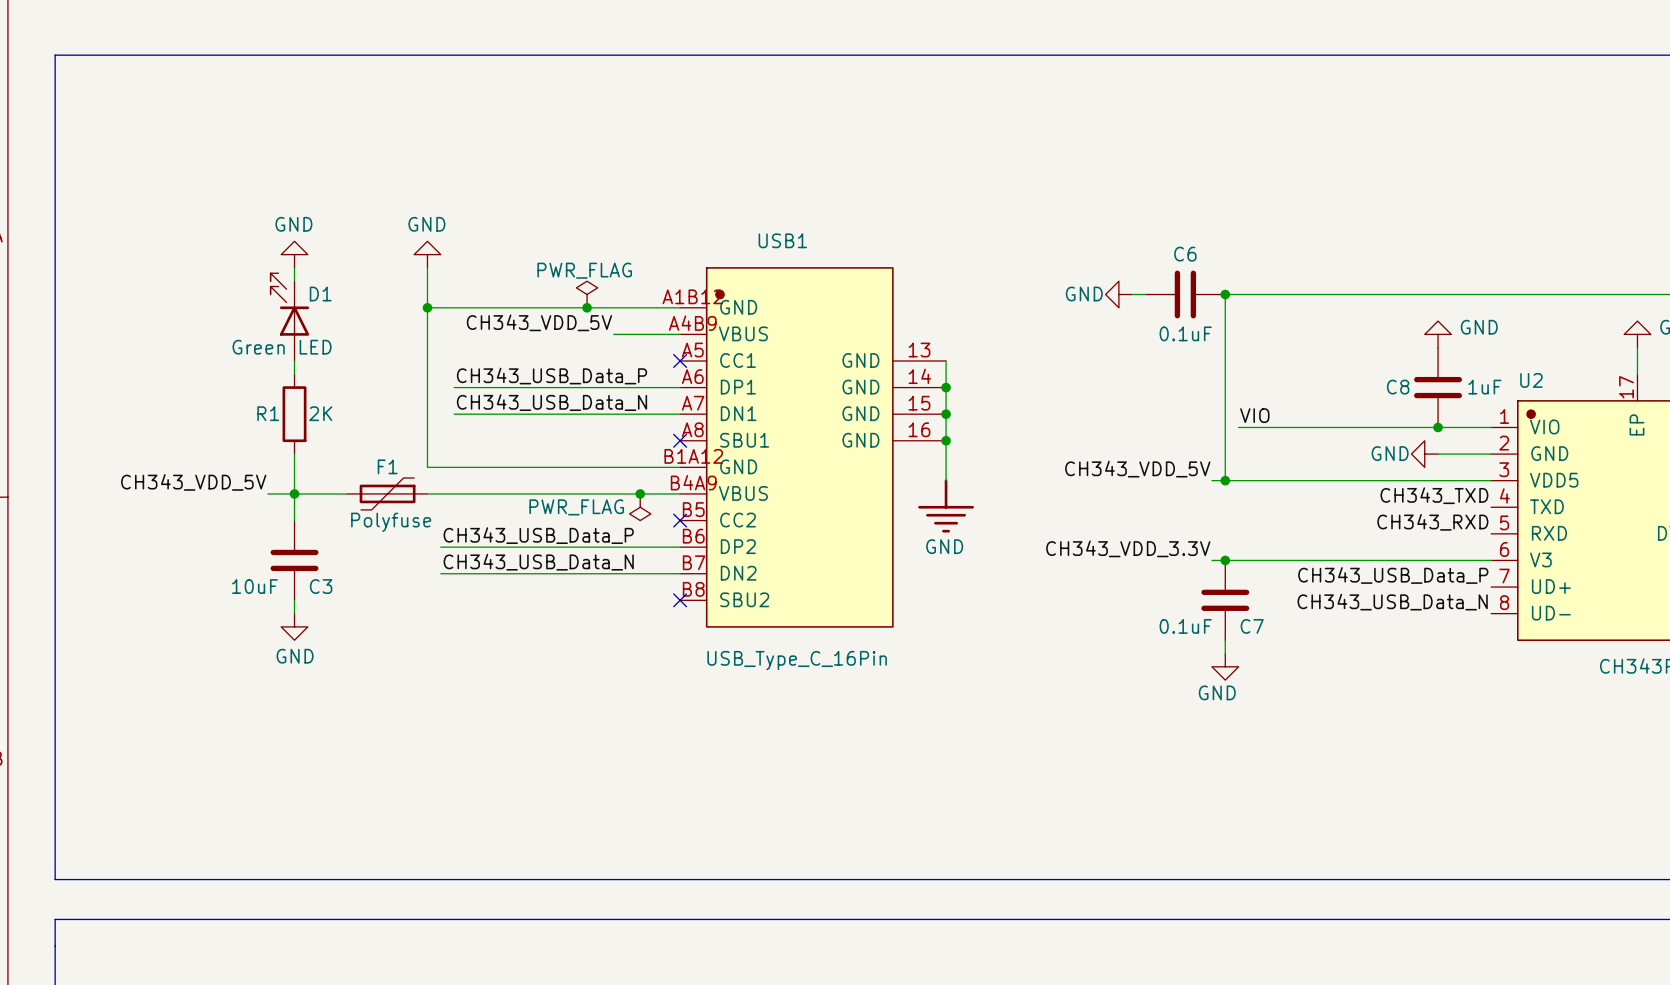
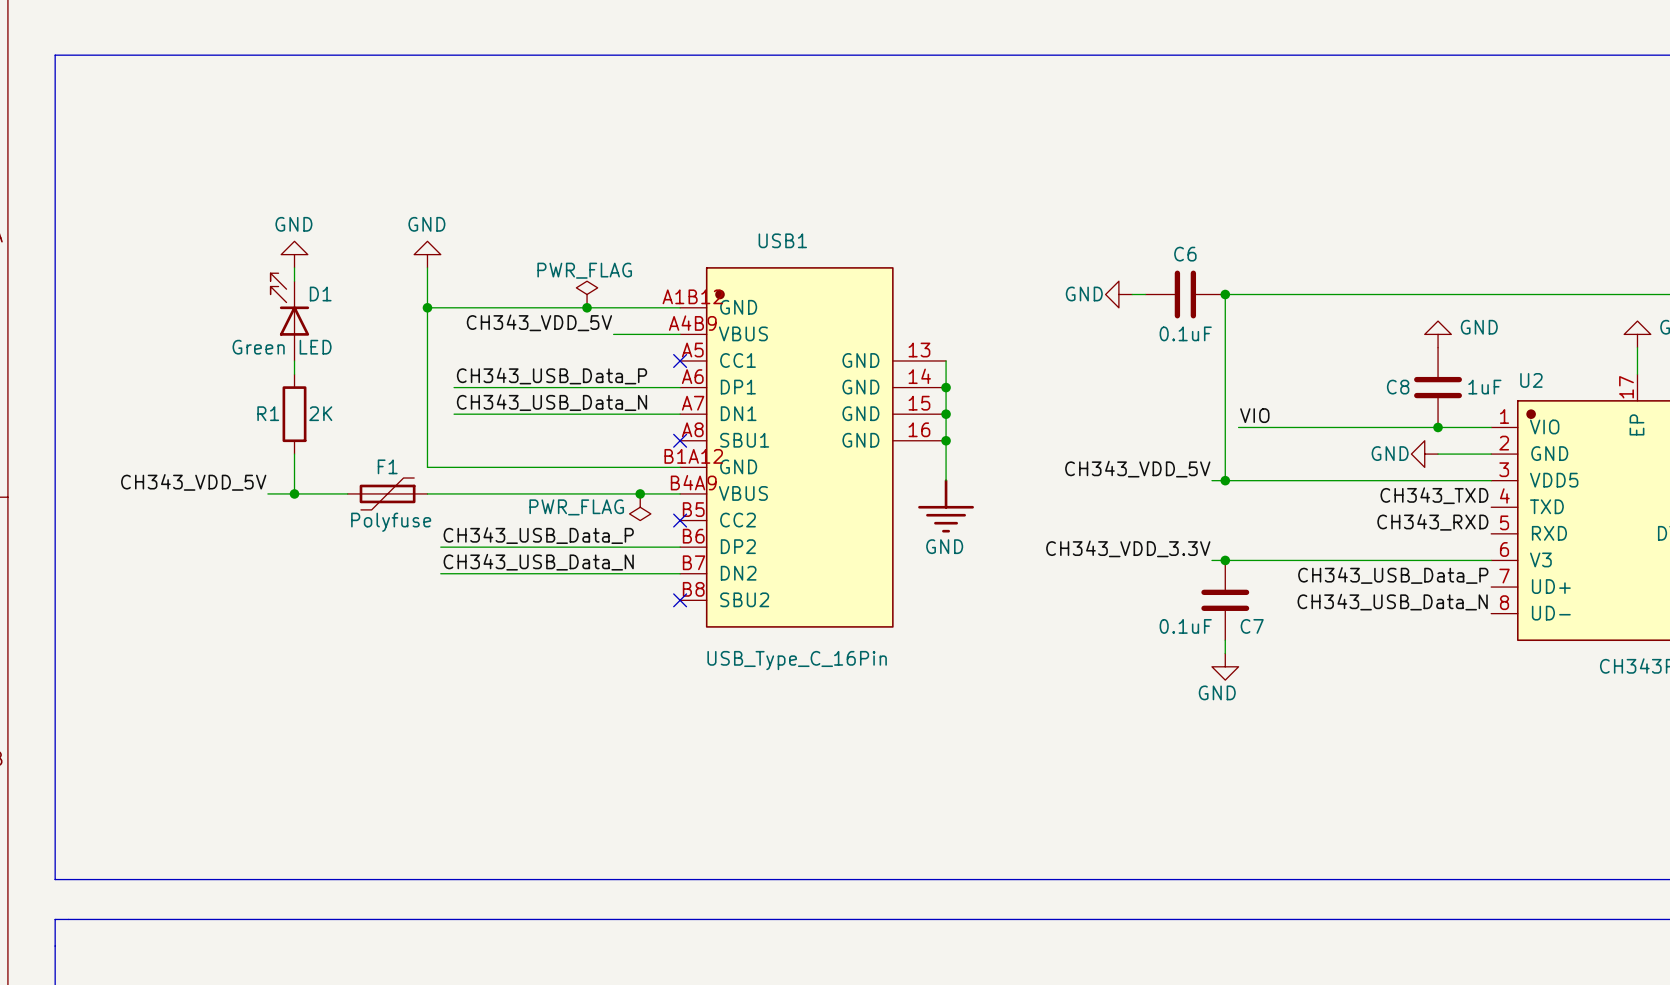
wire: (294, 493) (294, 520) -> none
C3: 10uF (294, 560) -> none
wire: (294, 600) (294, 613) -> none
power symbol: GND (294, 626) -> none

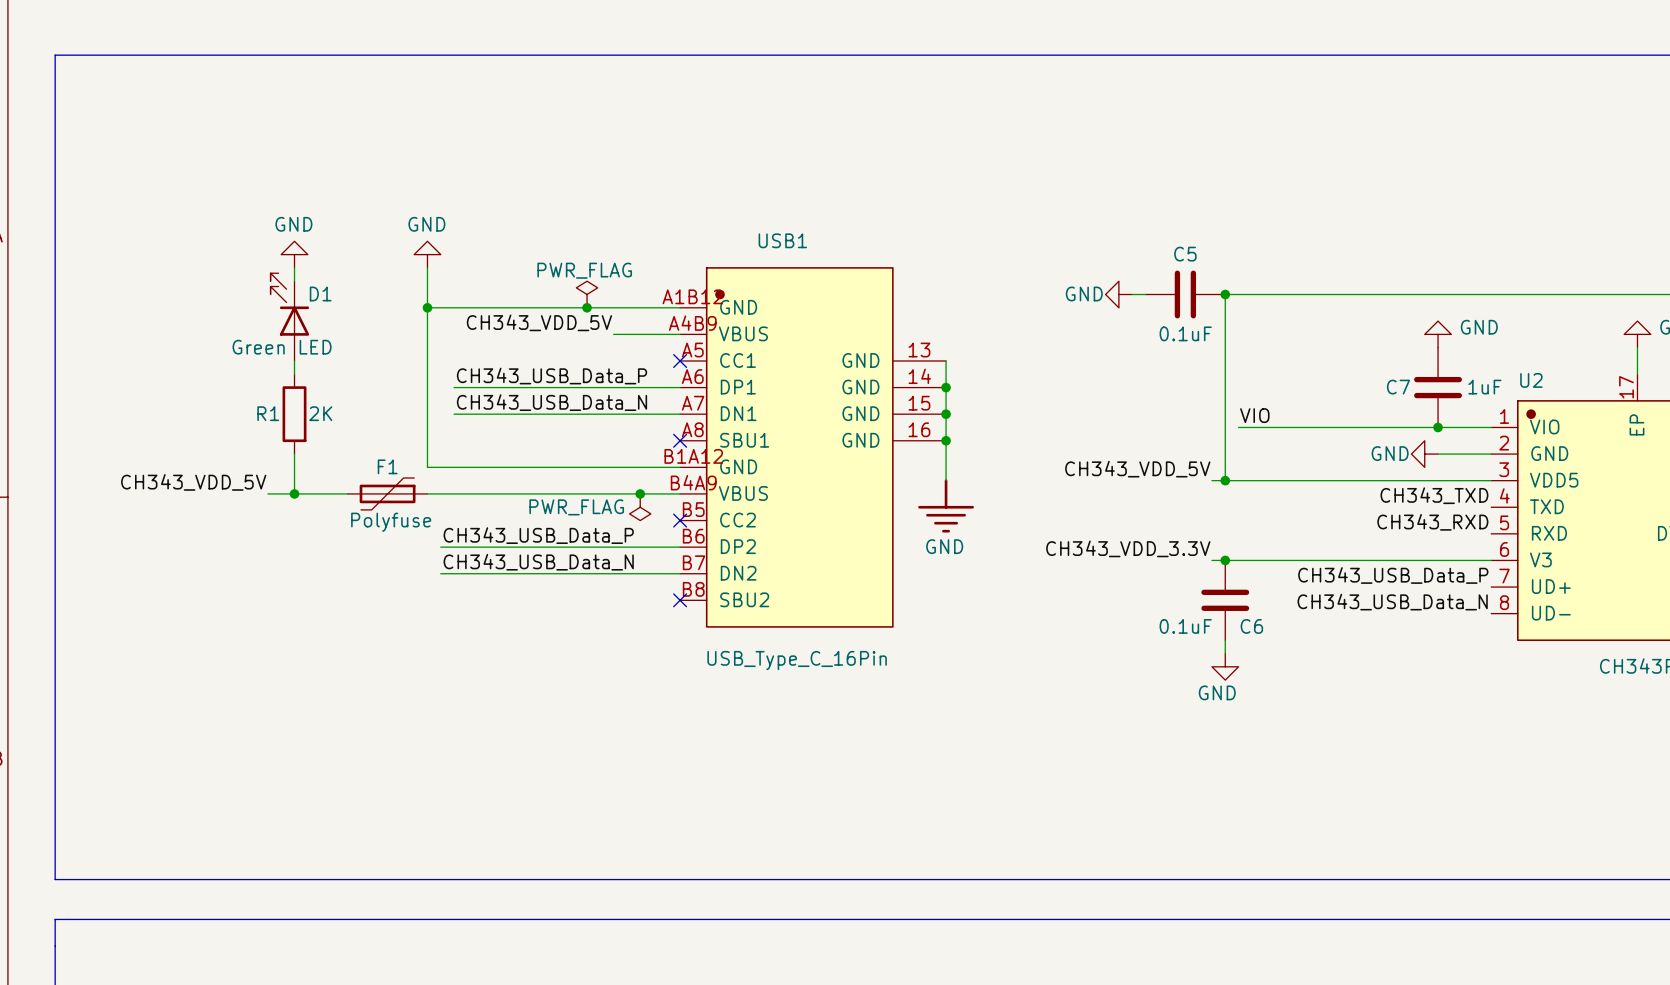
C6 name: C6 (1185, 254) -> C5 (1185, 254)
C8 name: C8 (1398, 387) -> C7 (1398, 387)
C7 name: C7 (1252, 626) -> C6 (1251, 626)

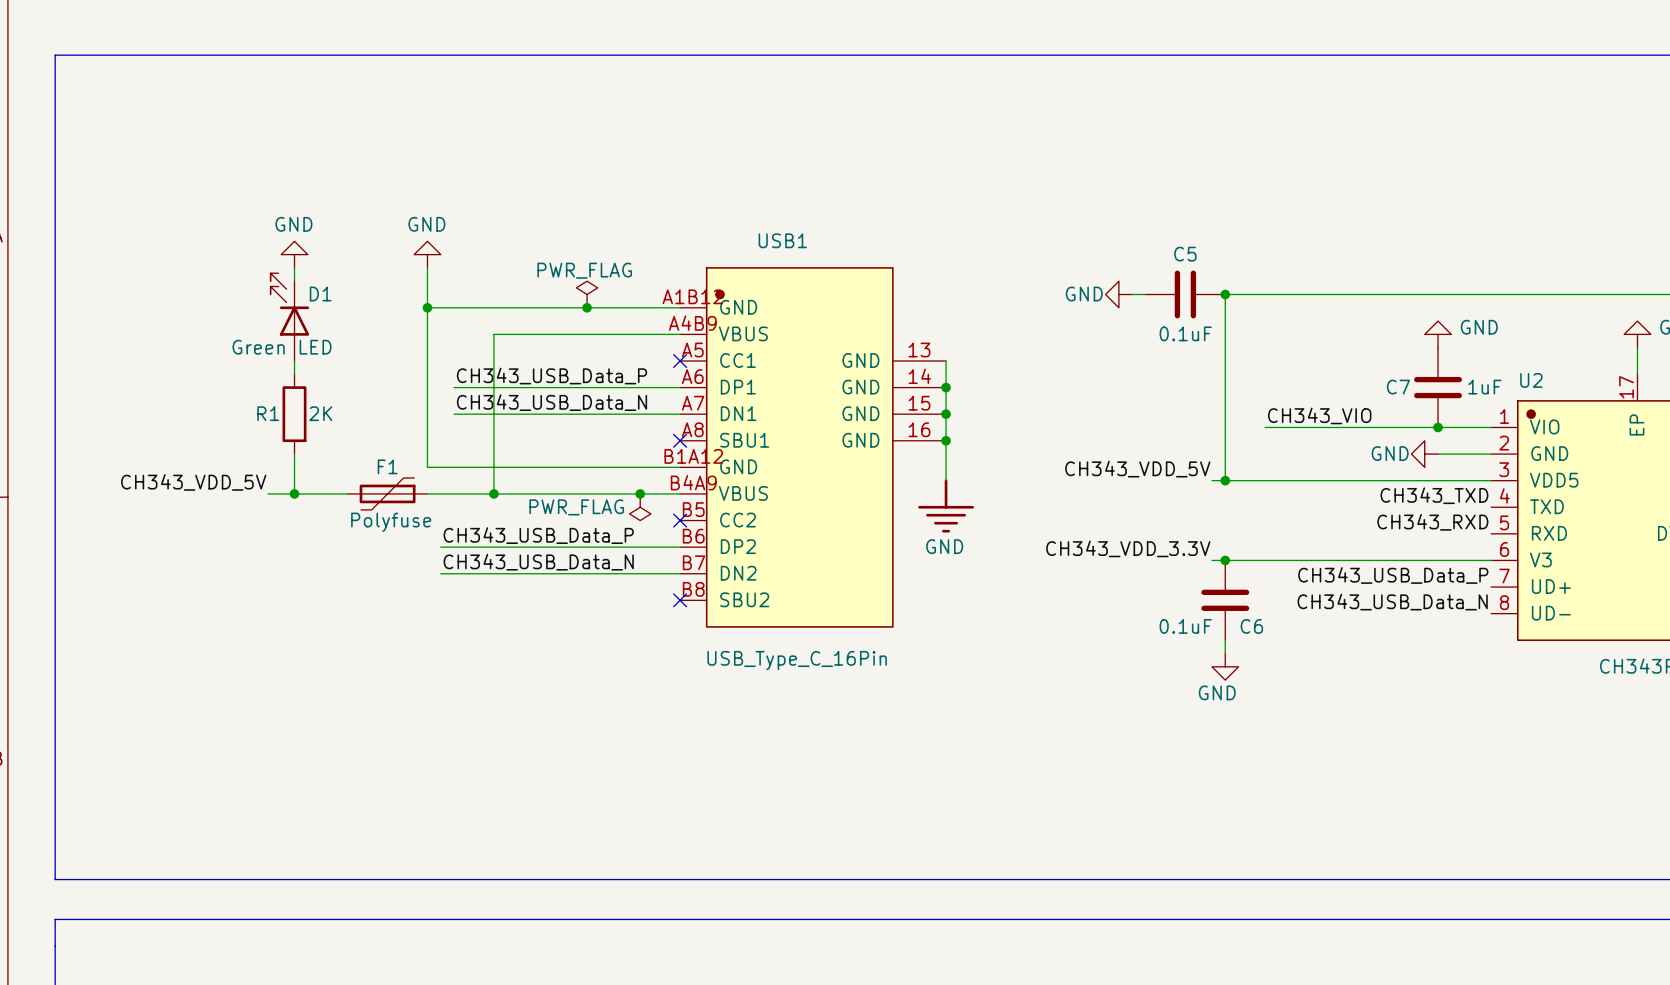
label: CH343_VDD_5V (539, 322) -> none
wire: none -> (613, 334) (493, 334) (493, 493)
label: VIO (1254, 415) -> none
label: none -> CH343_VIO (1319, 415)
wire: (1238, 427) (1265, 427) -> none
junction: none -> (493, 493)

